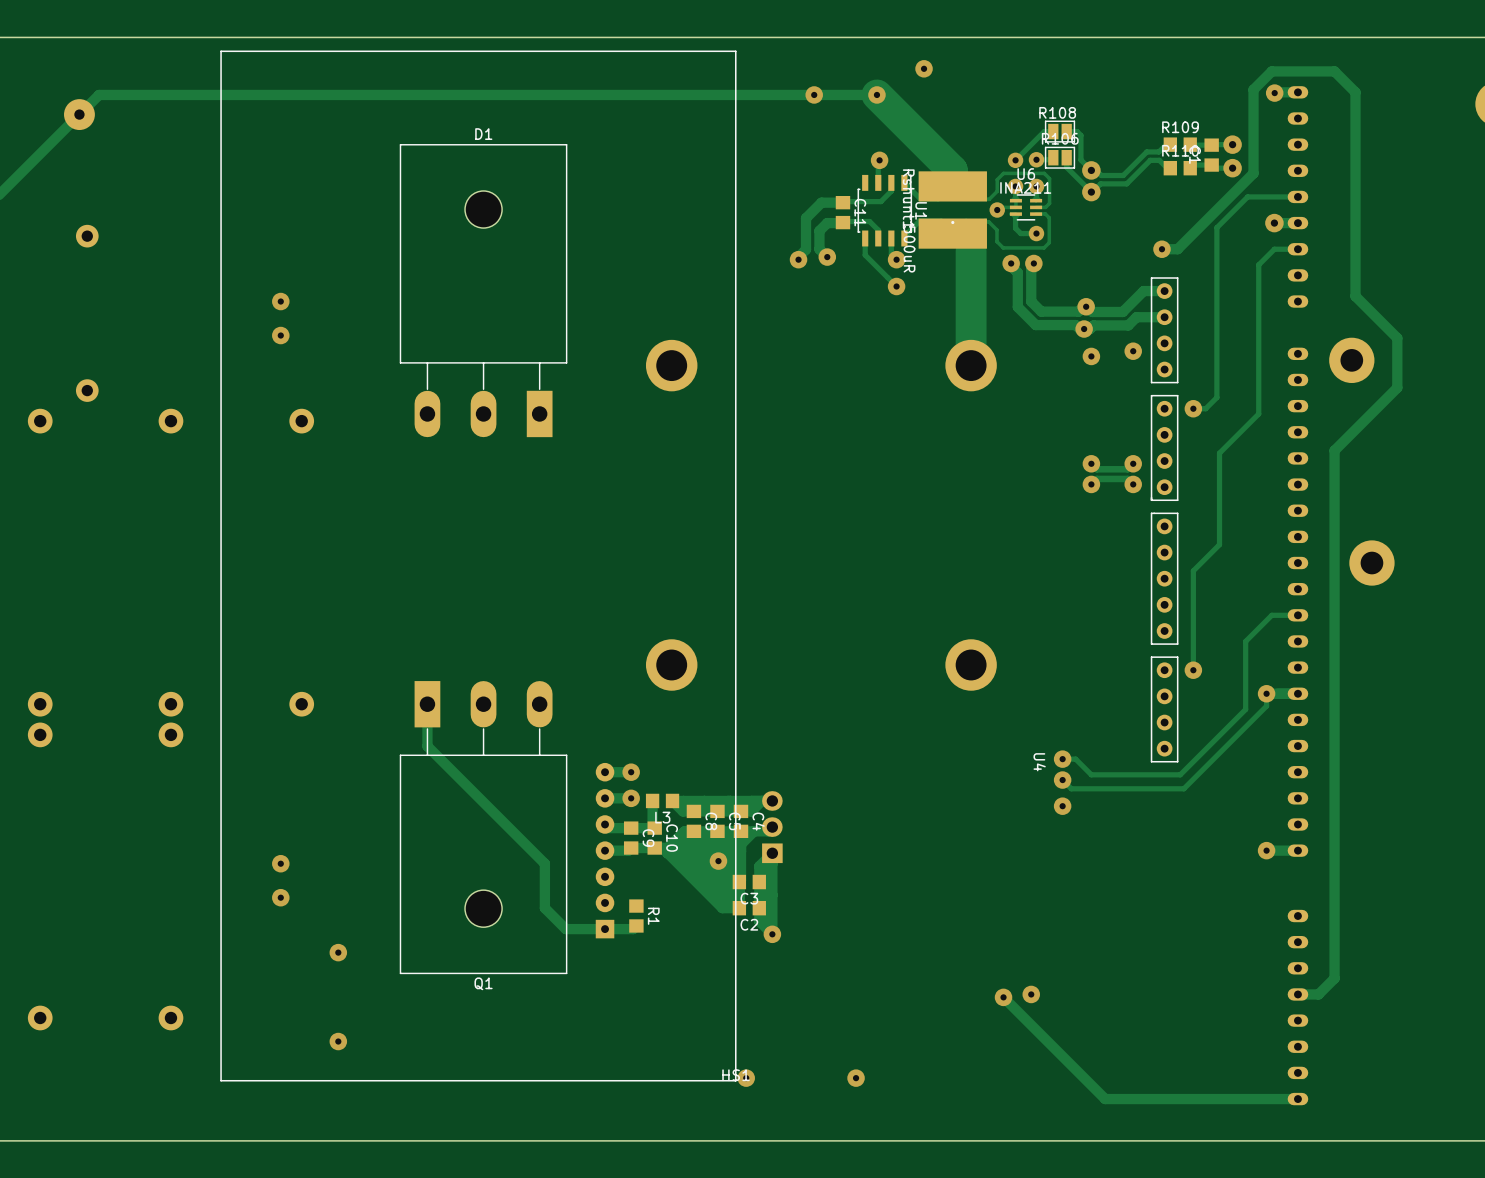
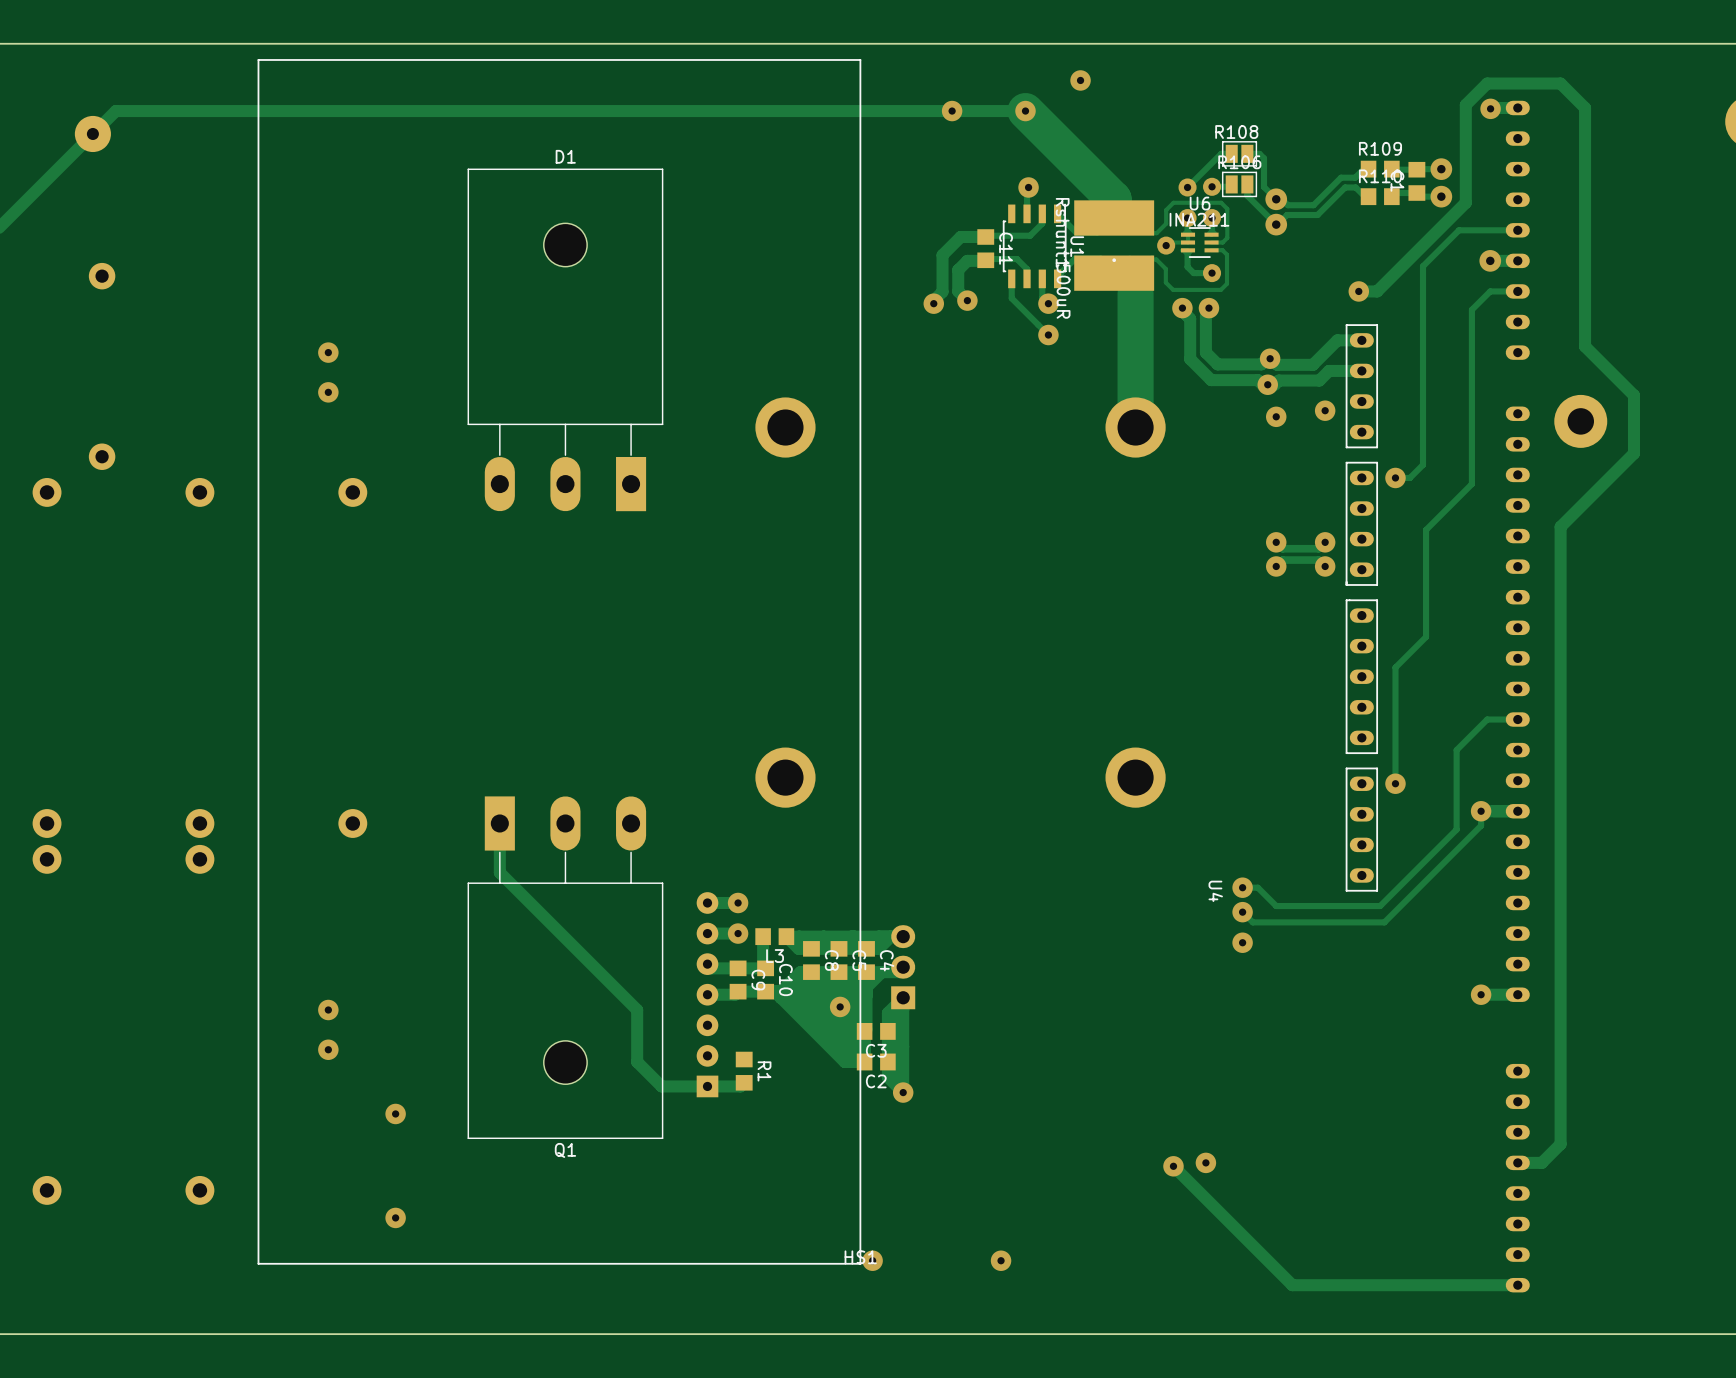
U4 footprint: [1150, 277, 1179, 763] -> [1345, 324, 1379, 892]
part: (1371, 563) -> none

